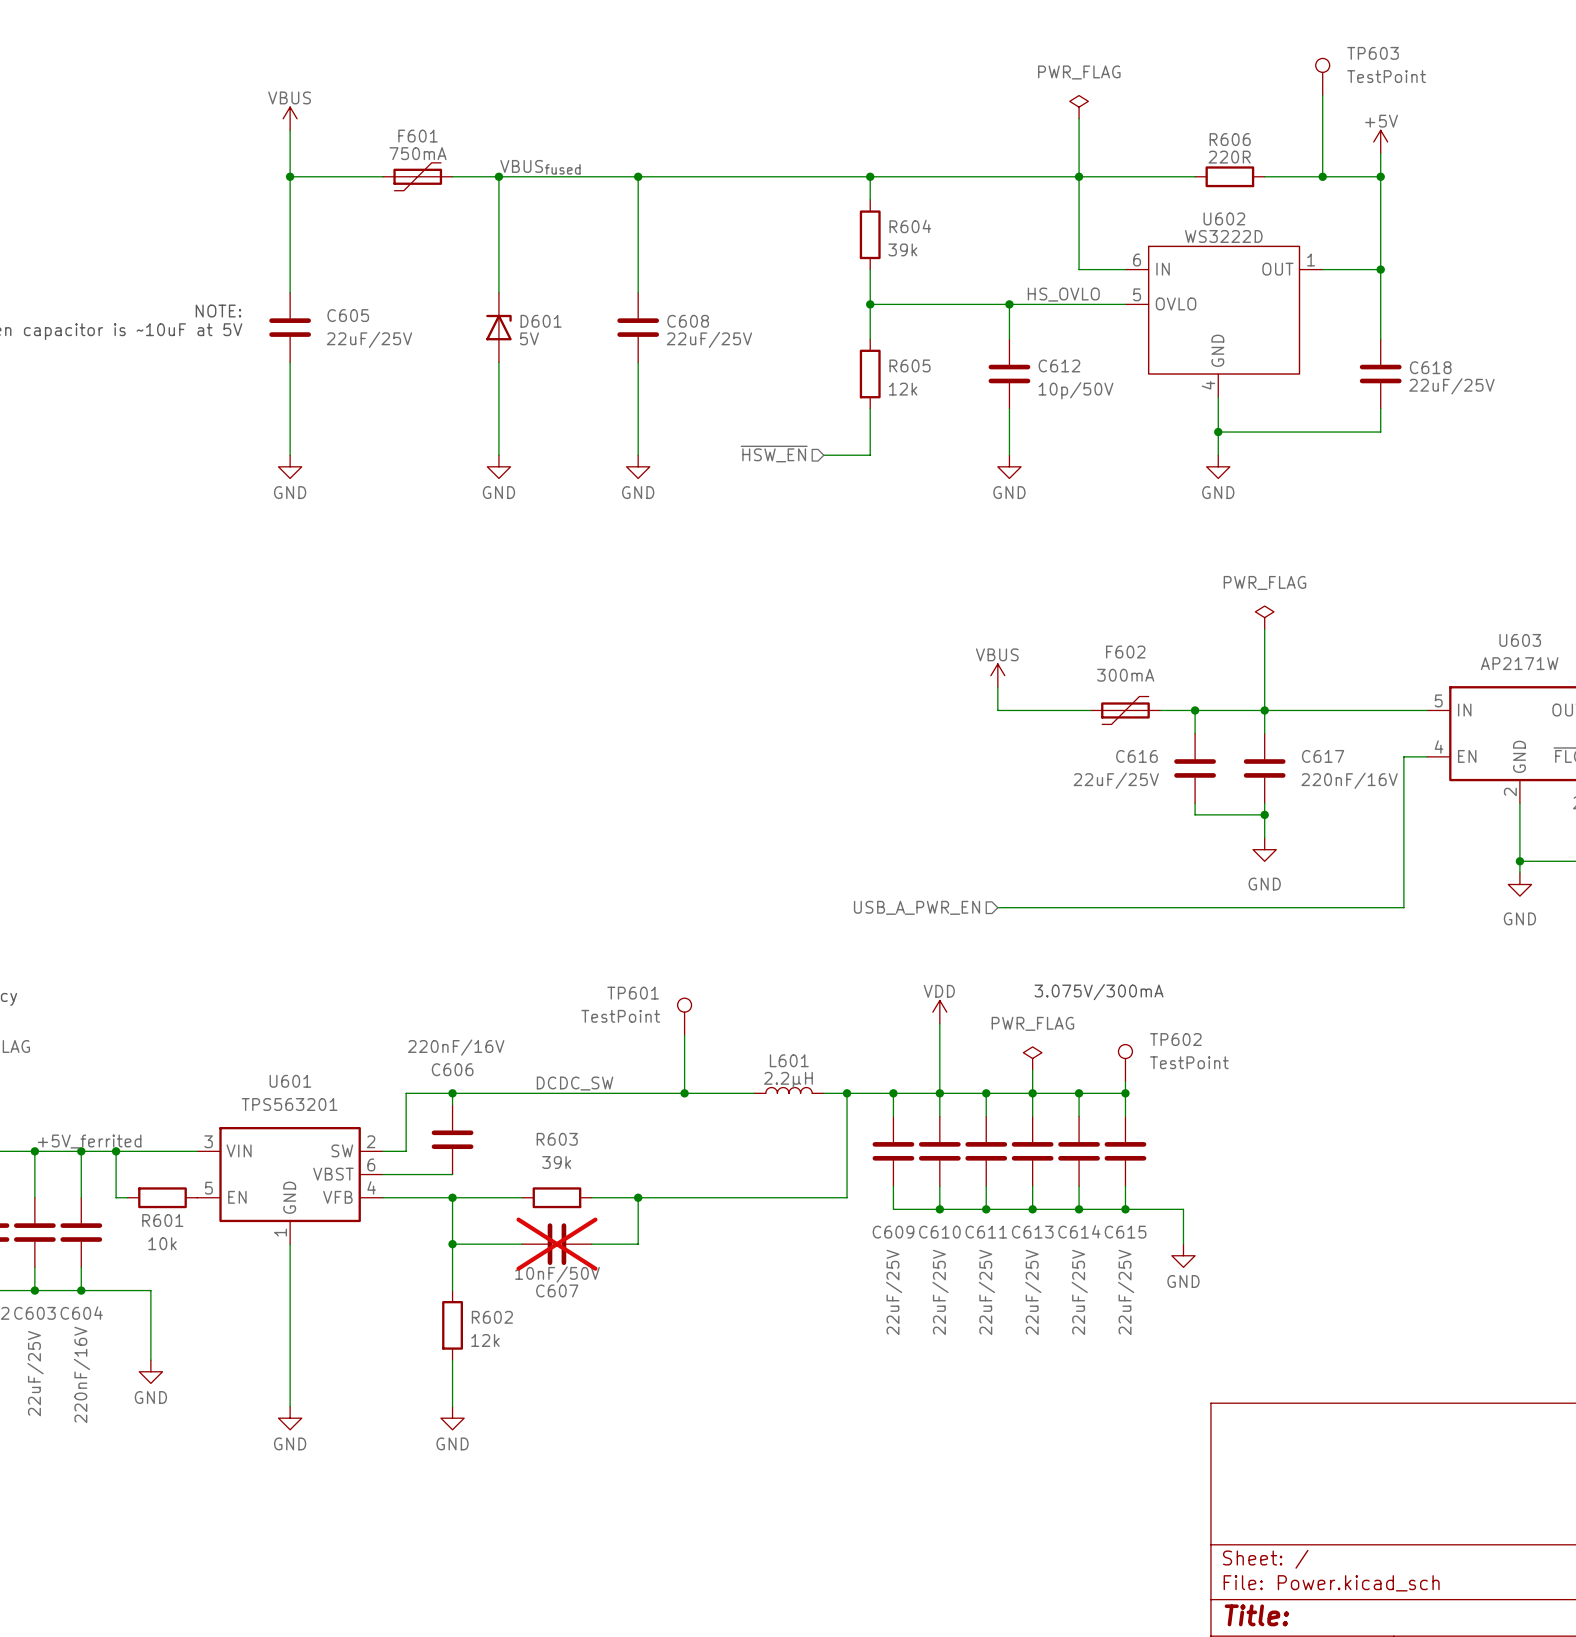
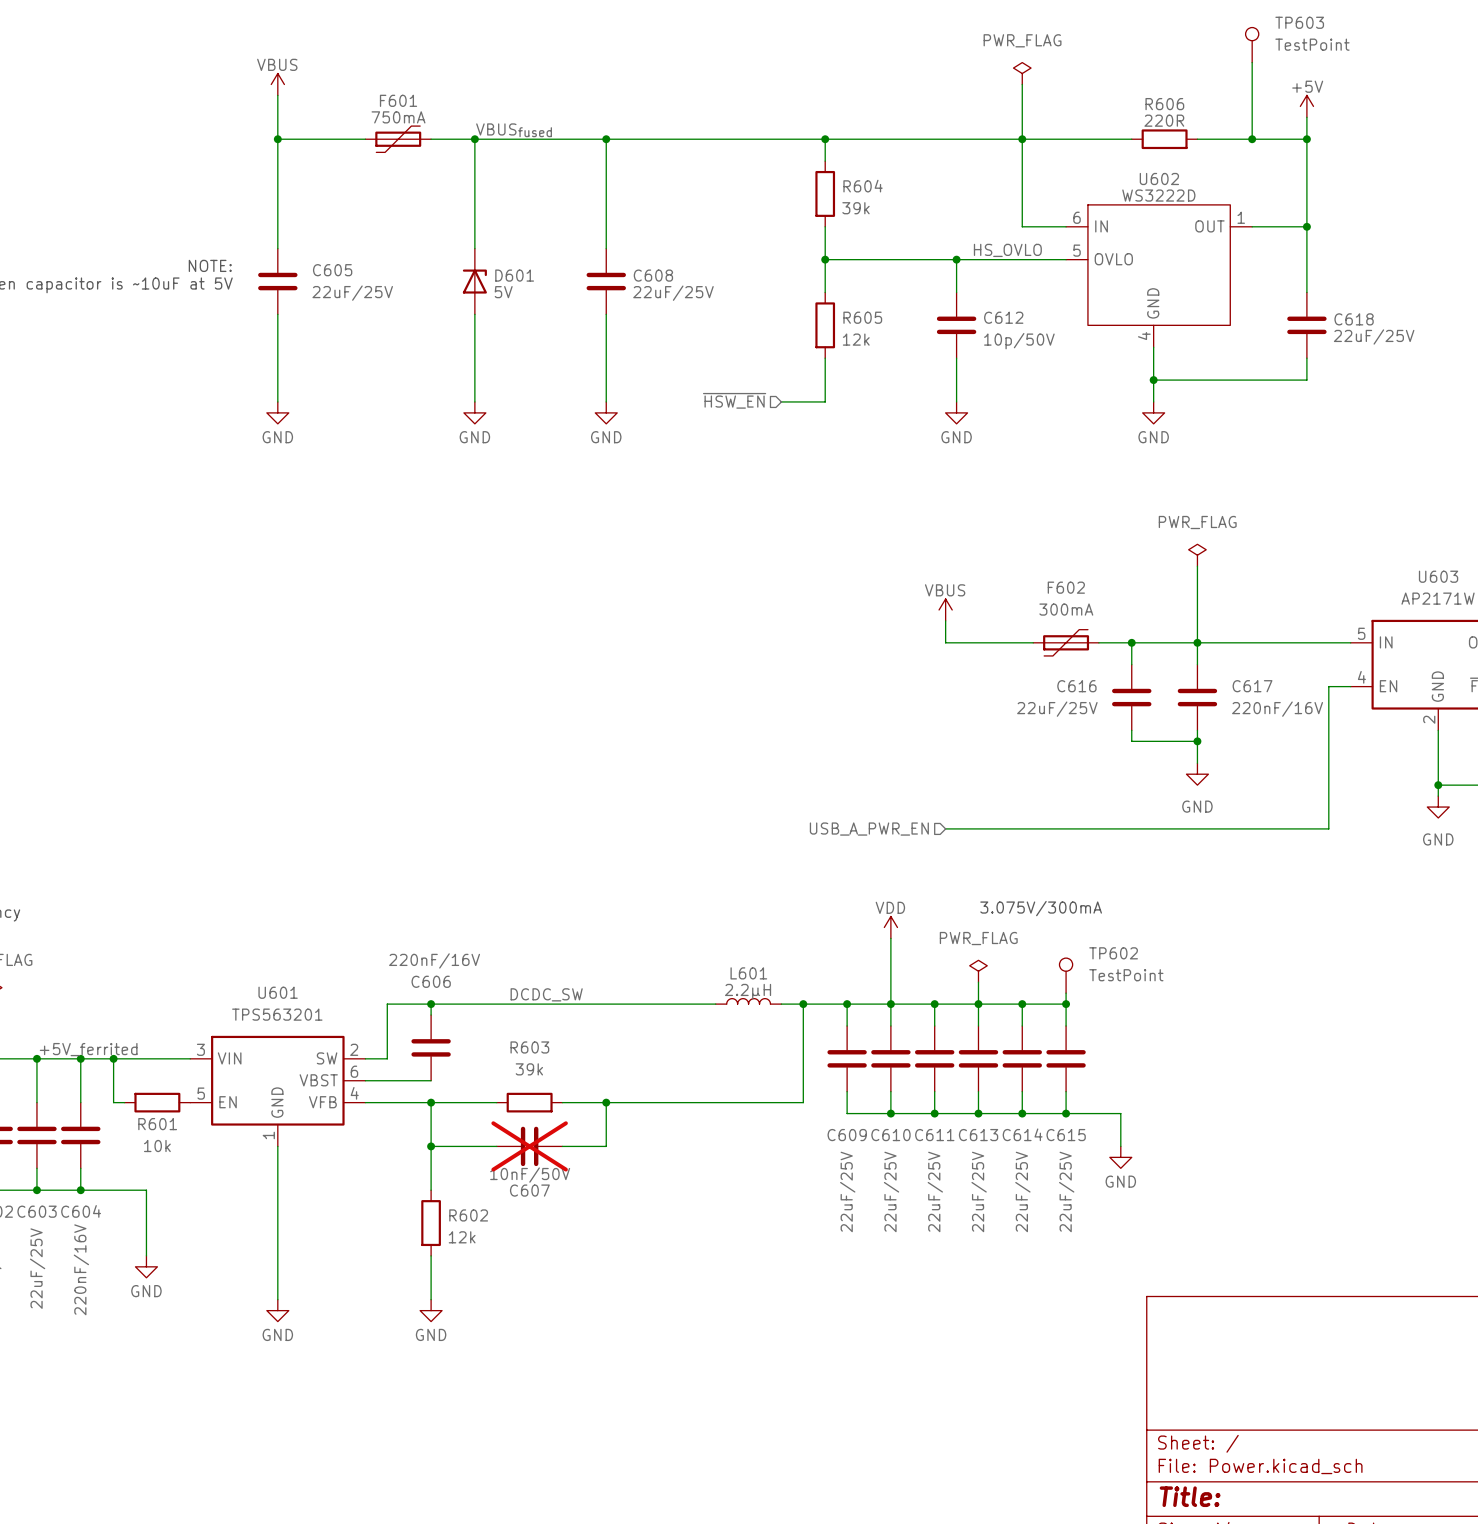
TP601: TestPoint (684, 1016) -> none
wire: (684, 1035) (684, 1093) -> none
junction: (684, 1093) -> none

